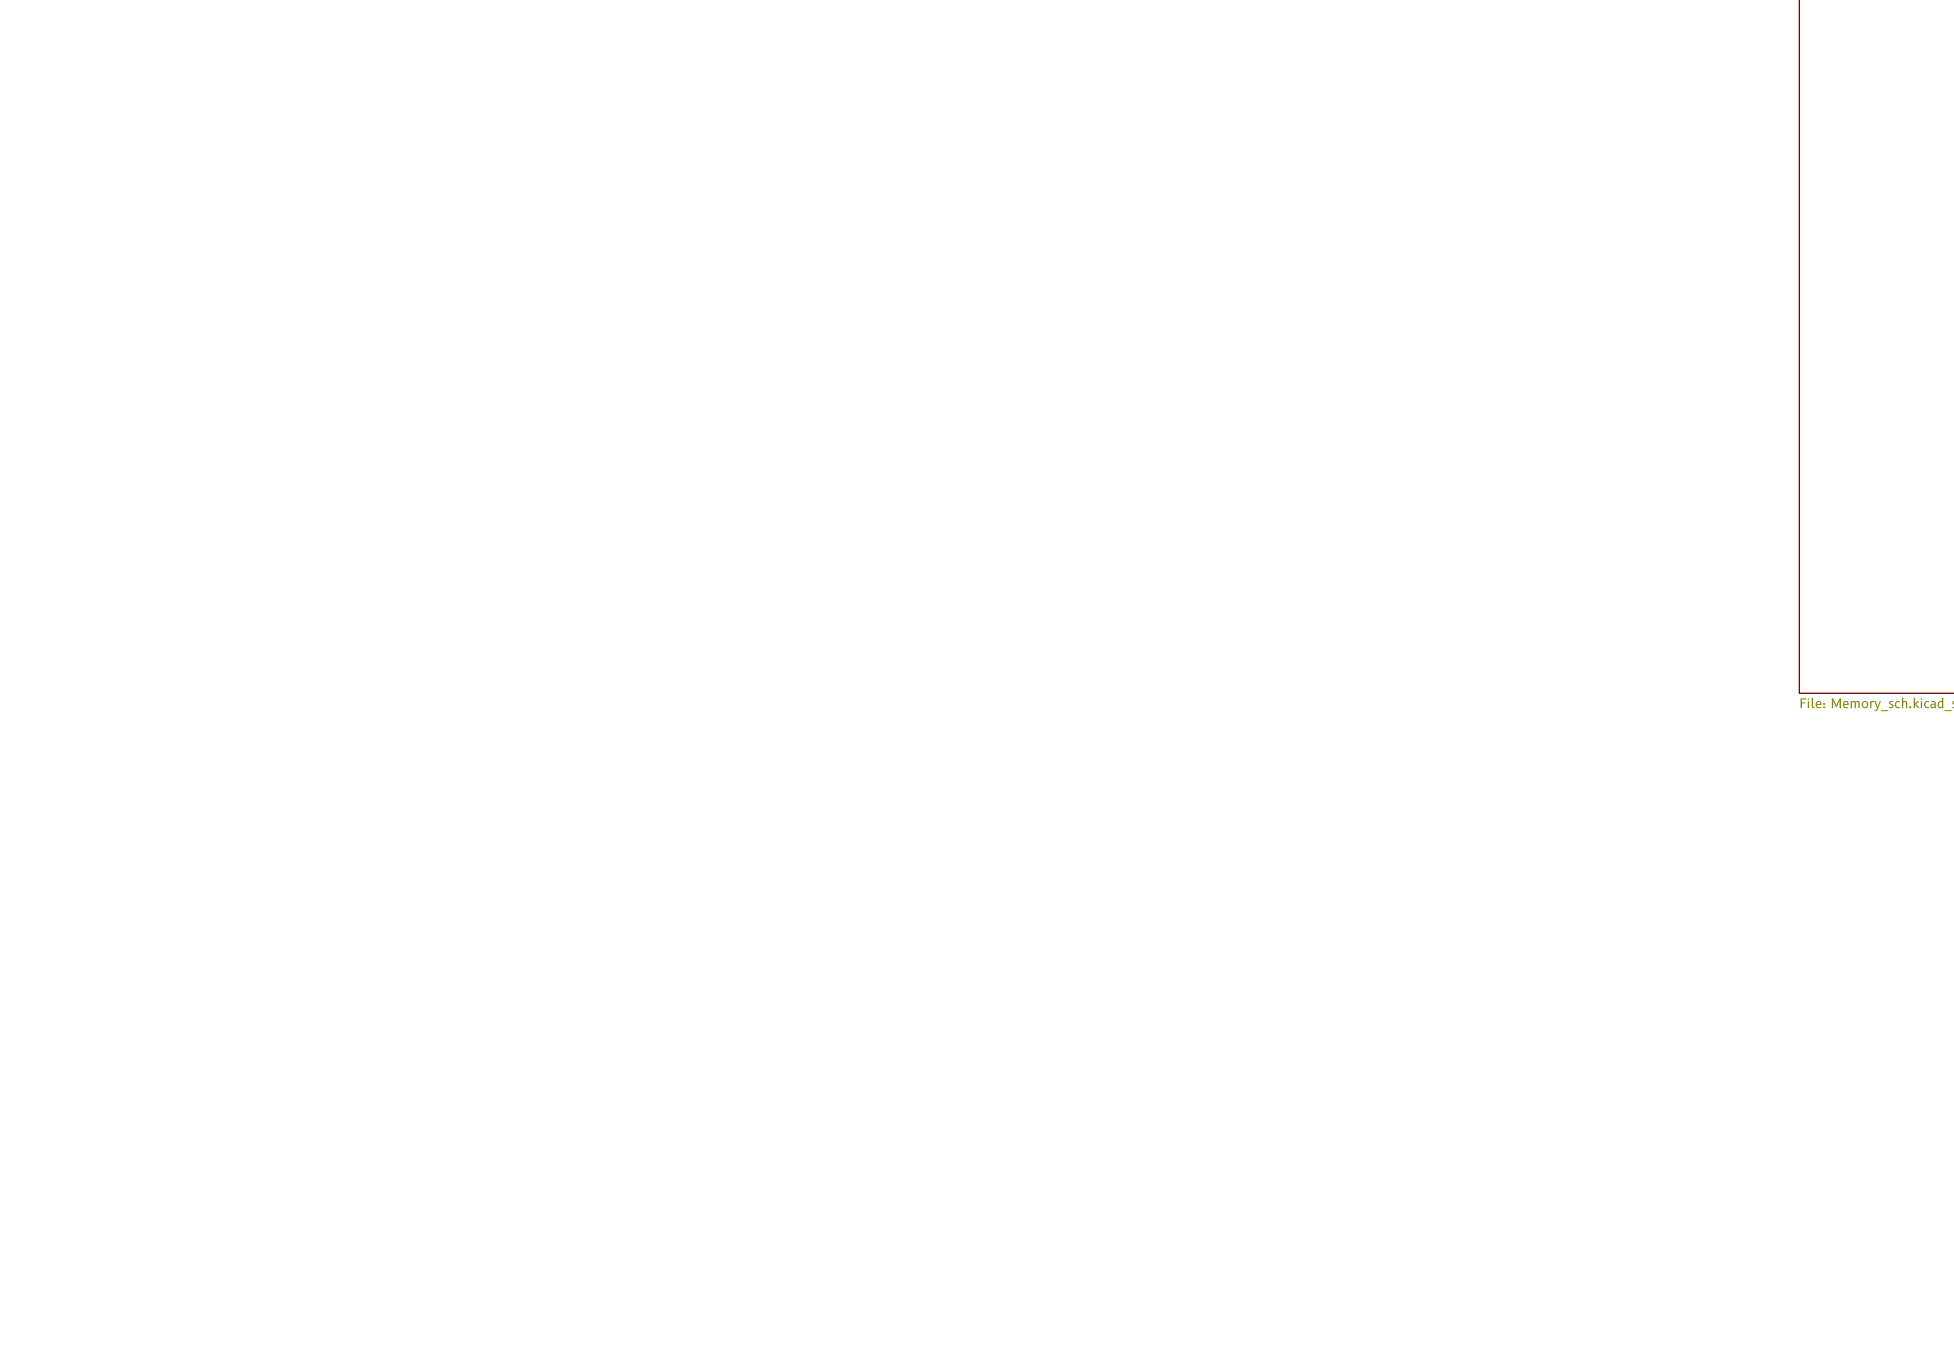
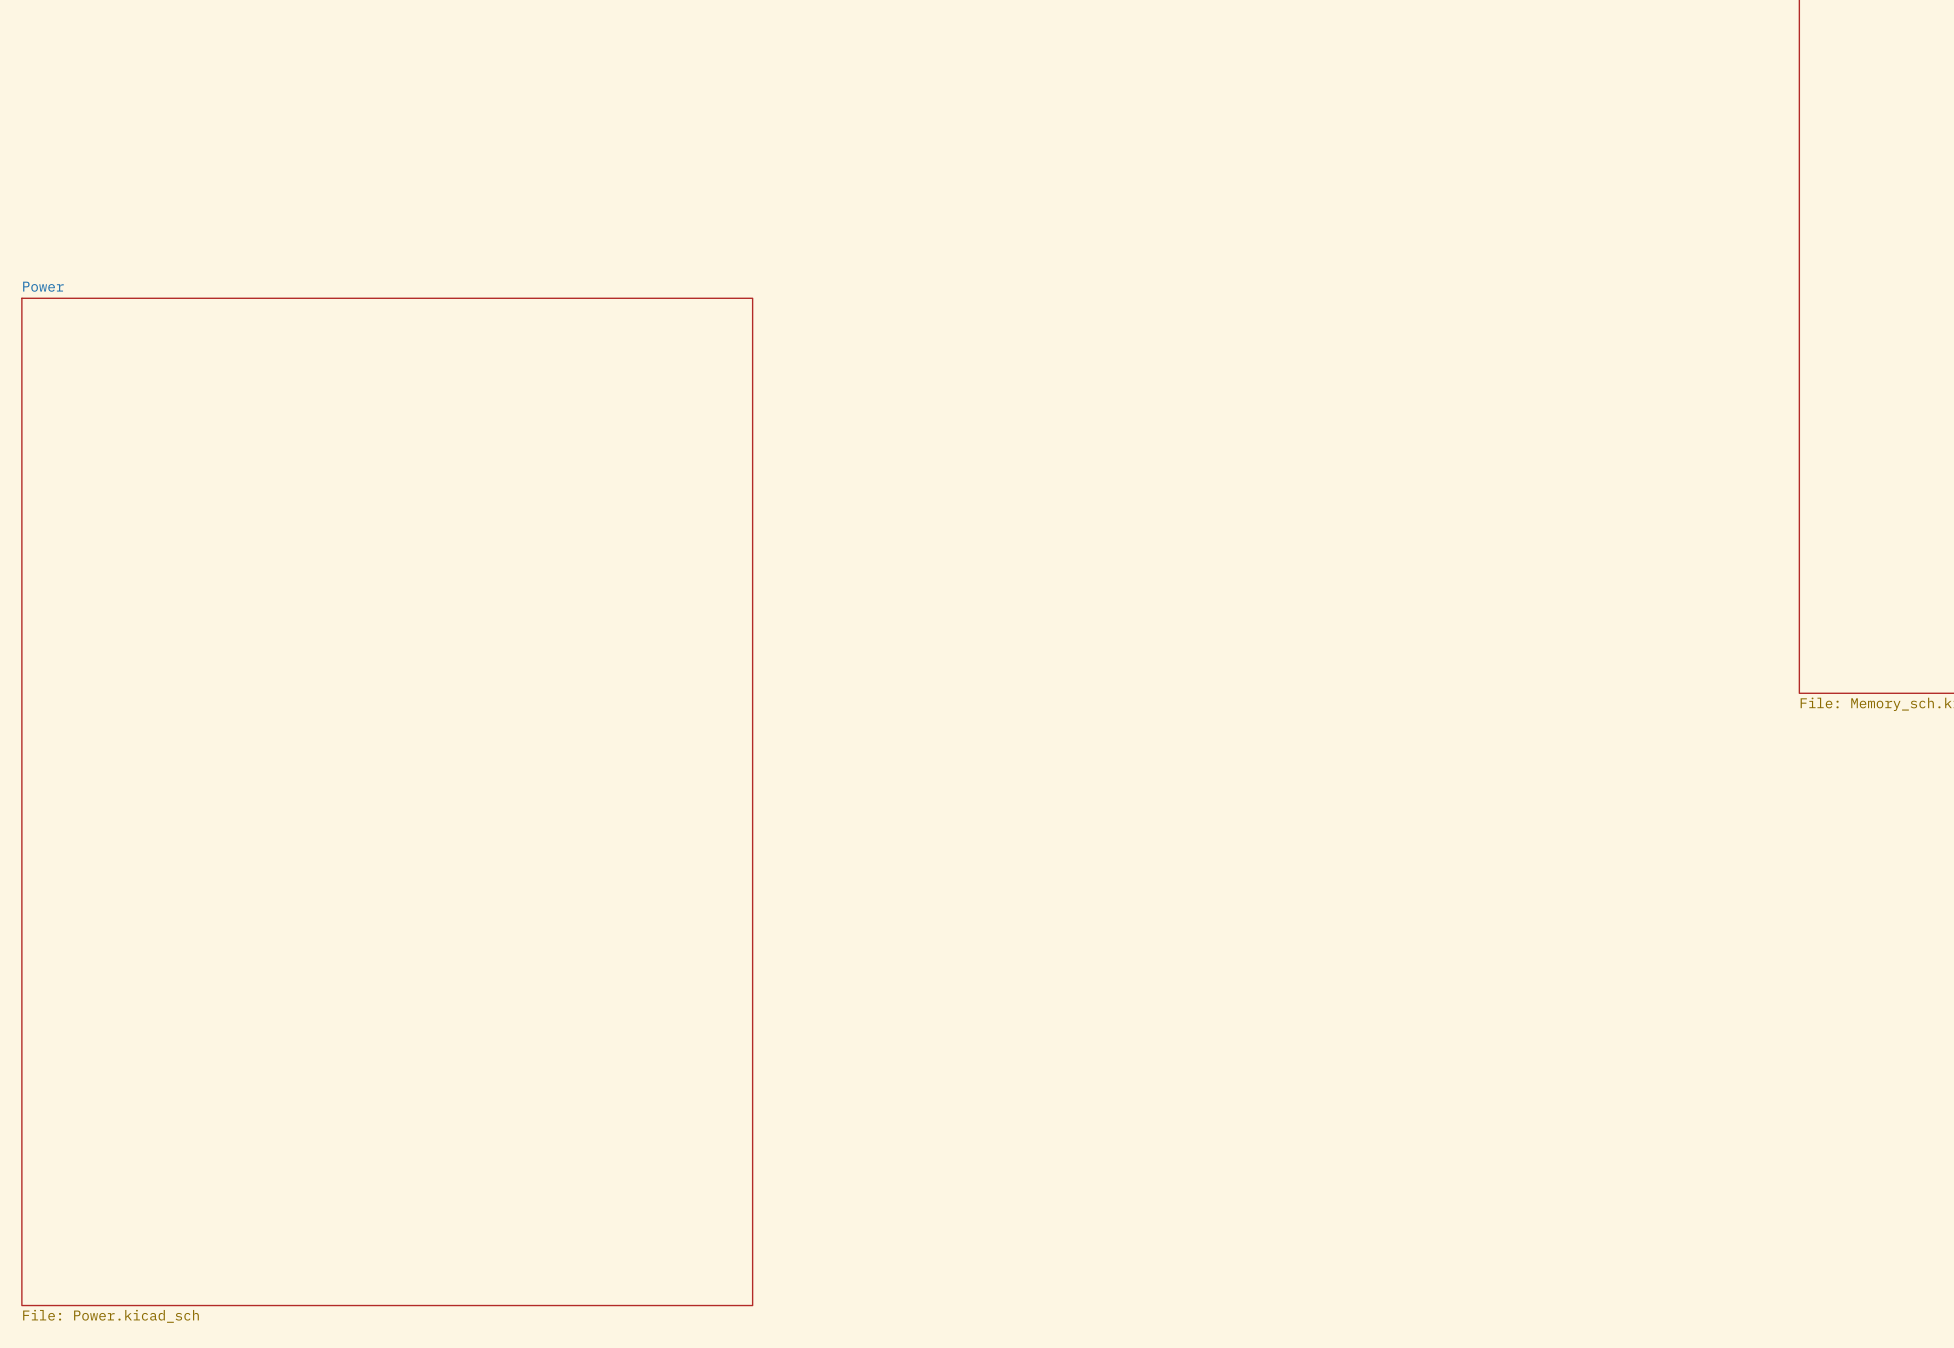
sheet Power: none -> File: Power.kicad_sch (387, 801)

